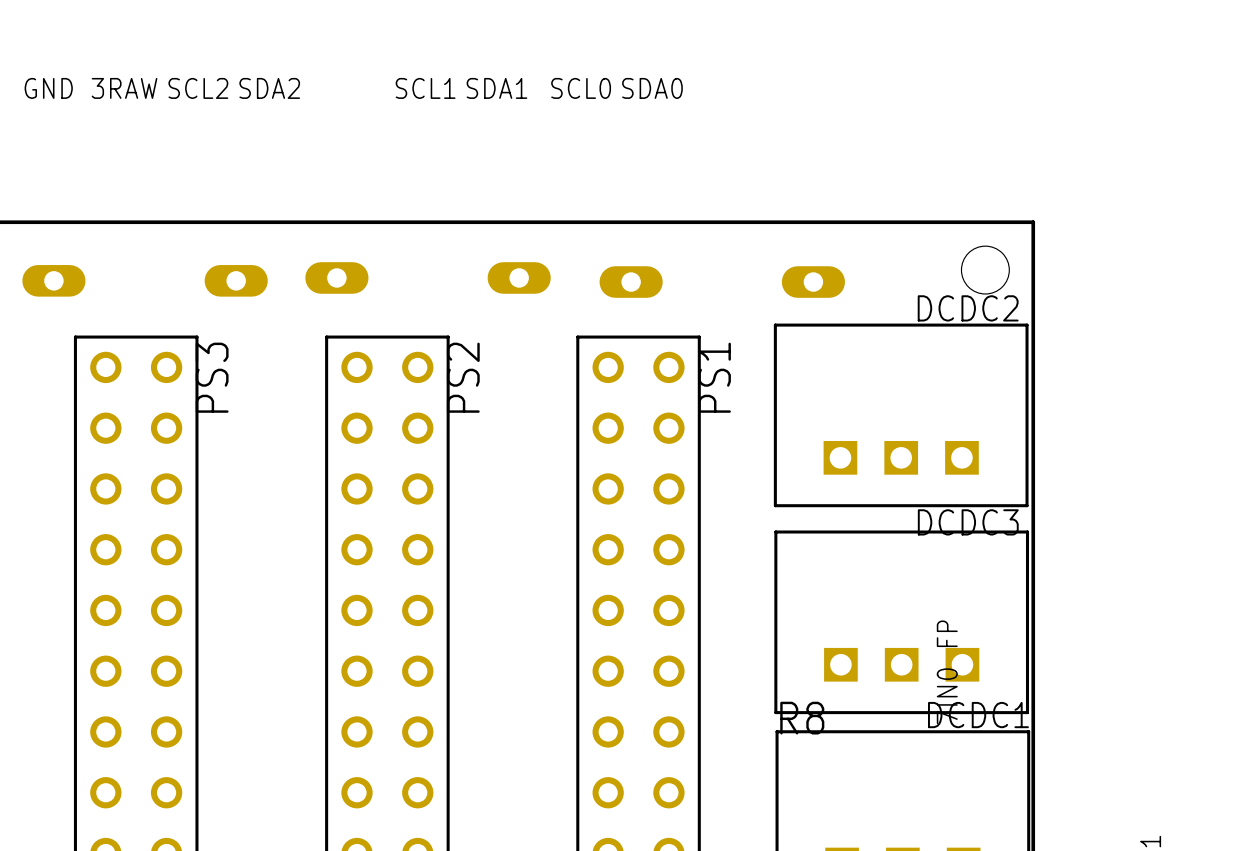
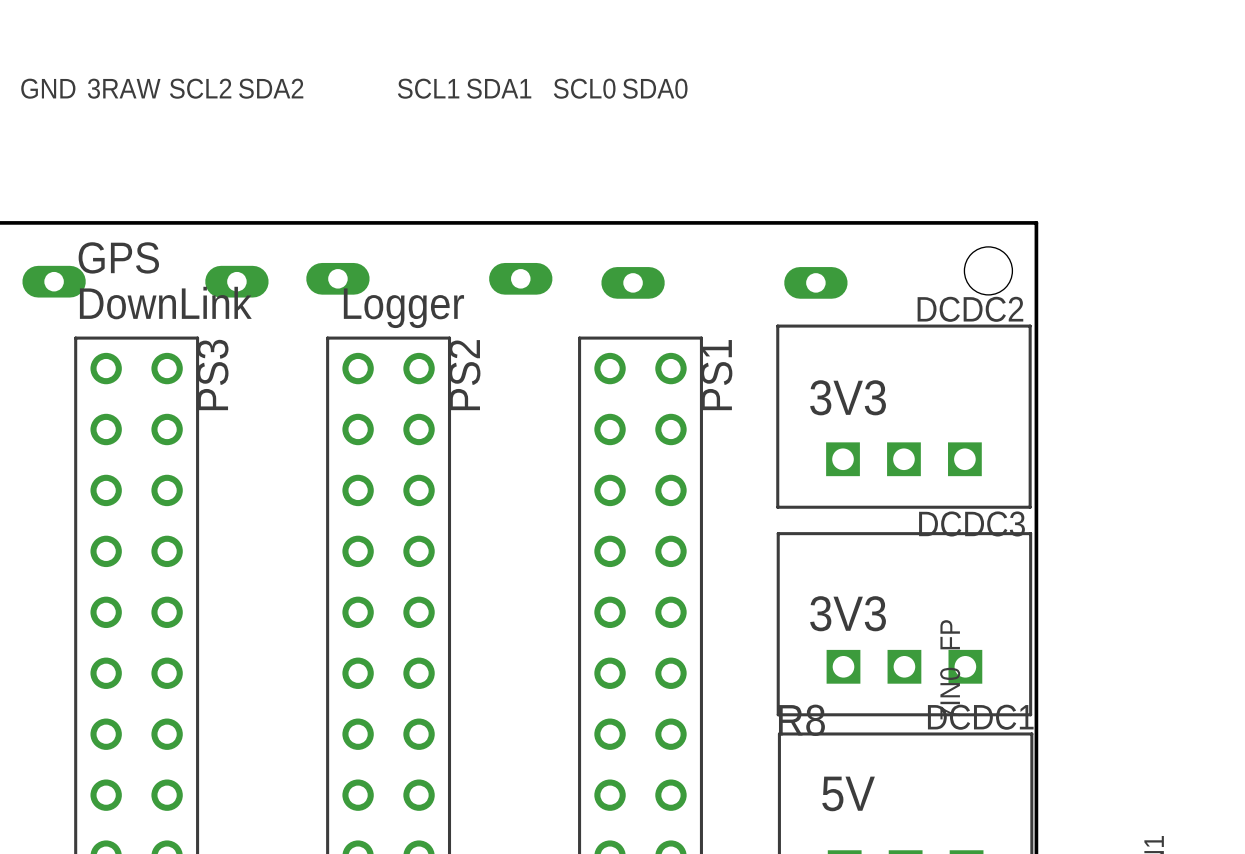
text: none -> GPS (118, 257)
text: none -> DownLink (165, 303)
text: none -> Logger (403, 308)
text: none -> 3V3 (848, 397)
text: none -> 3V3 (848, 613)
text: none -> 5V (848, 793)

